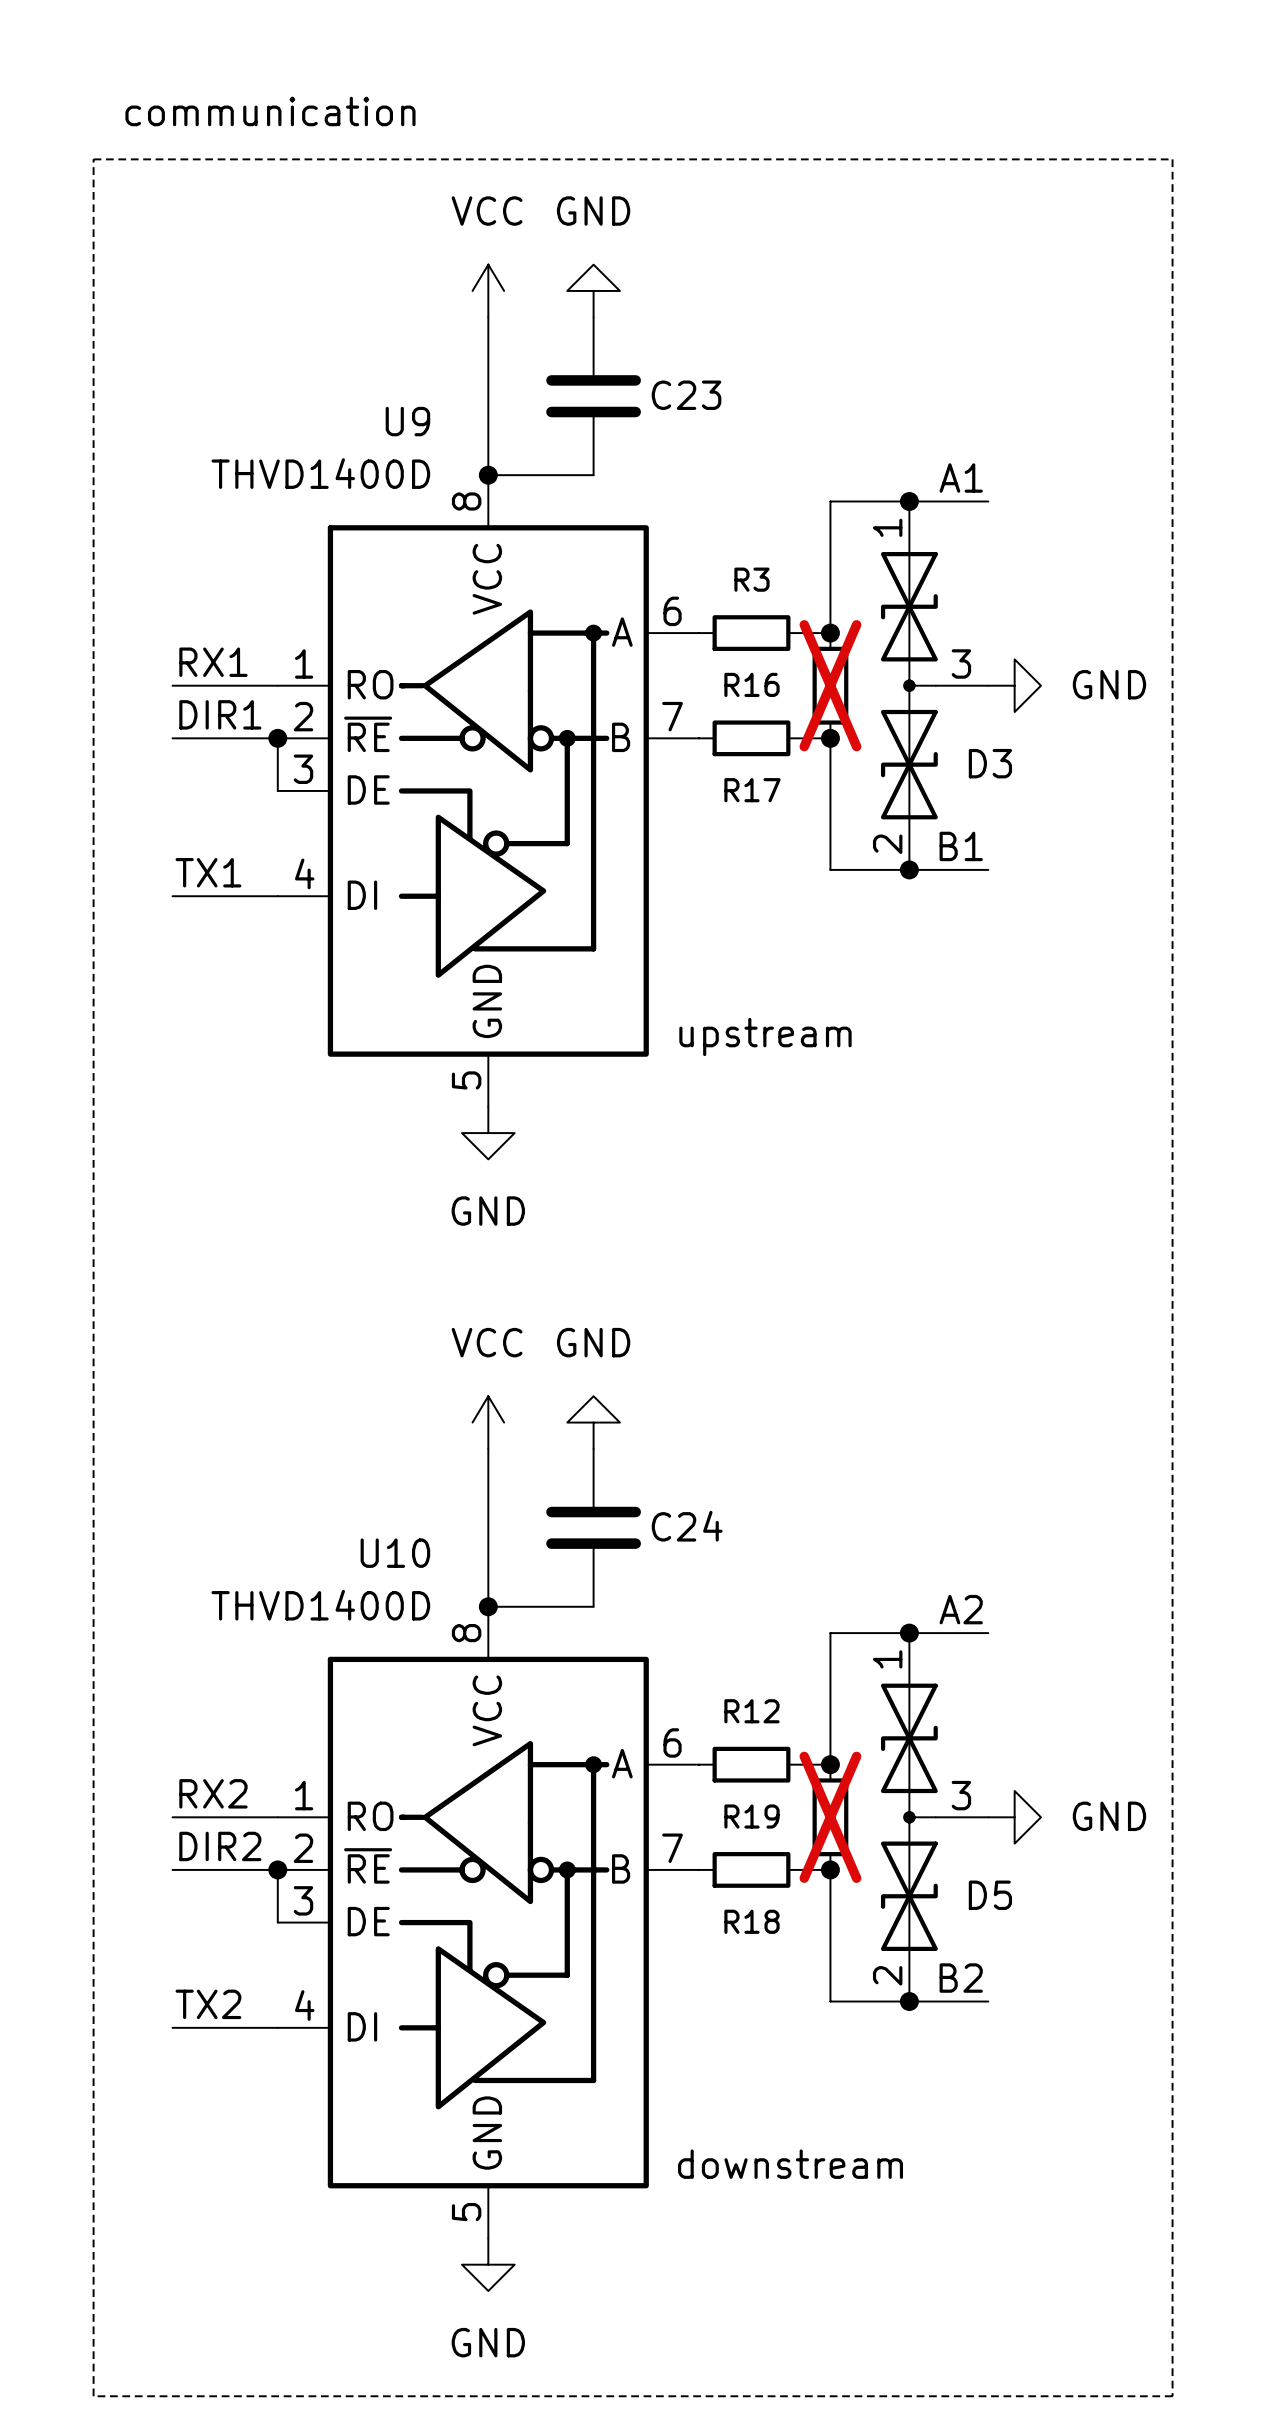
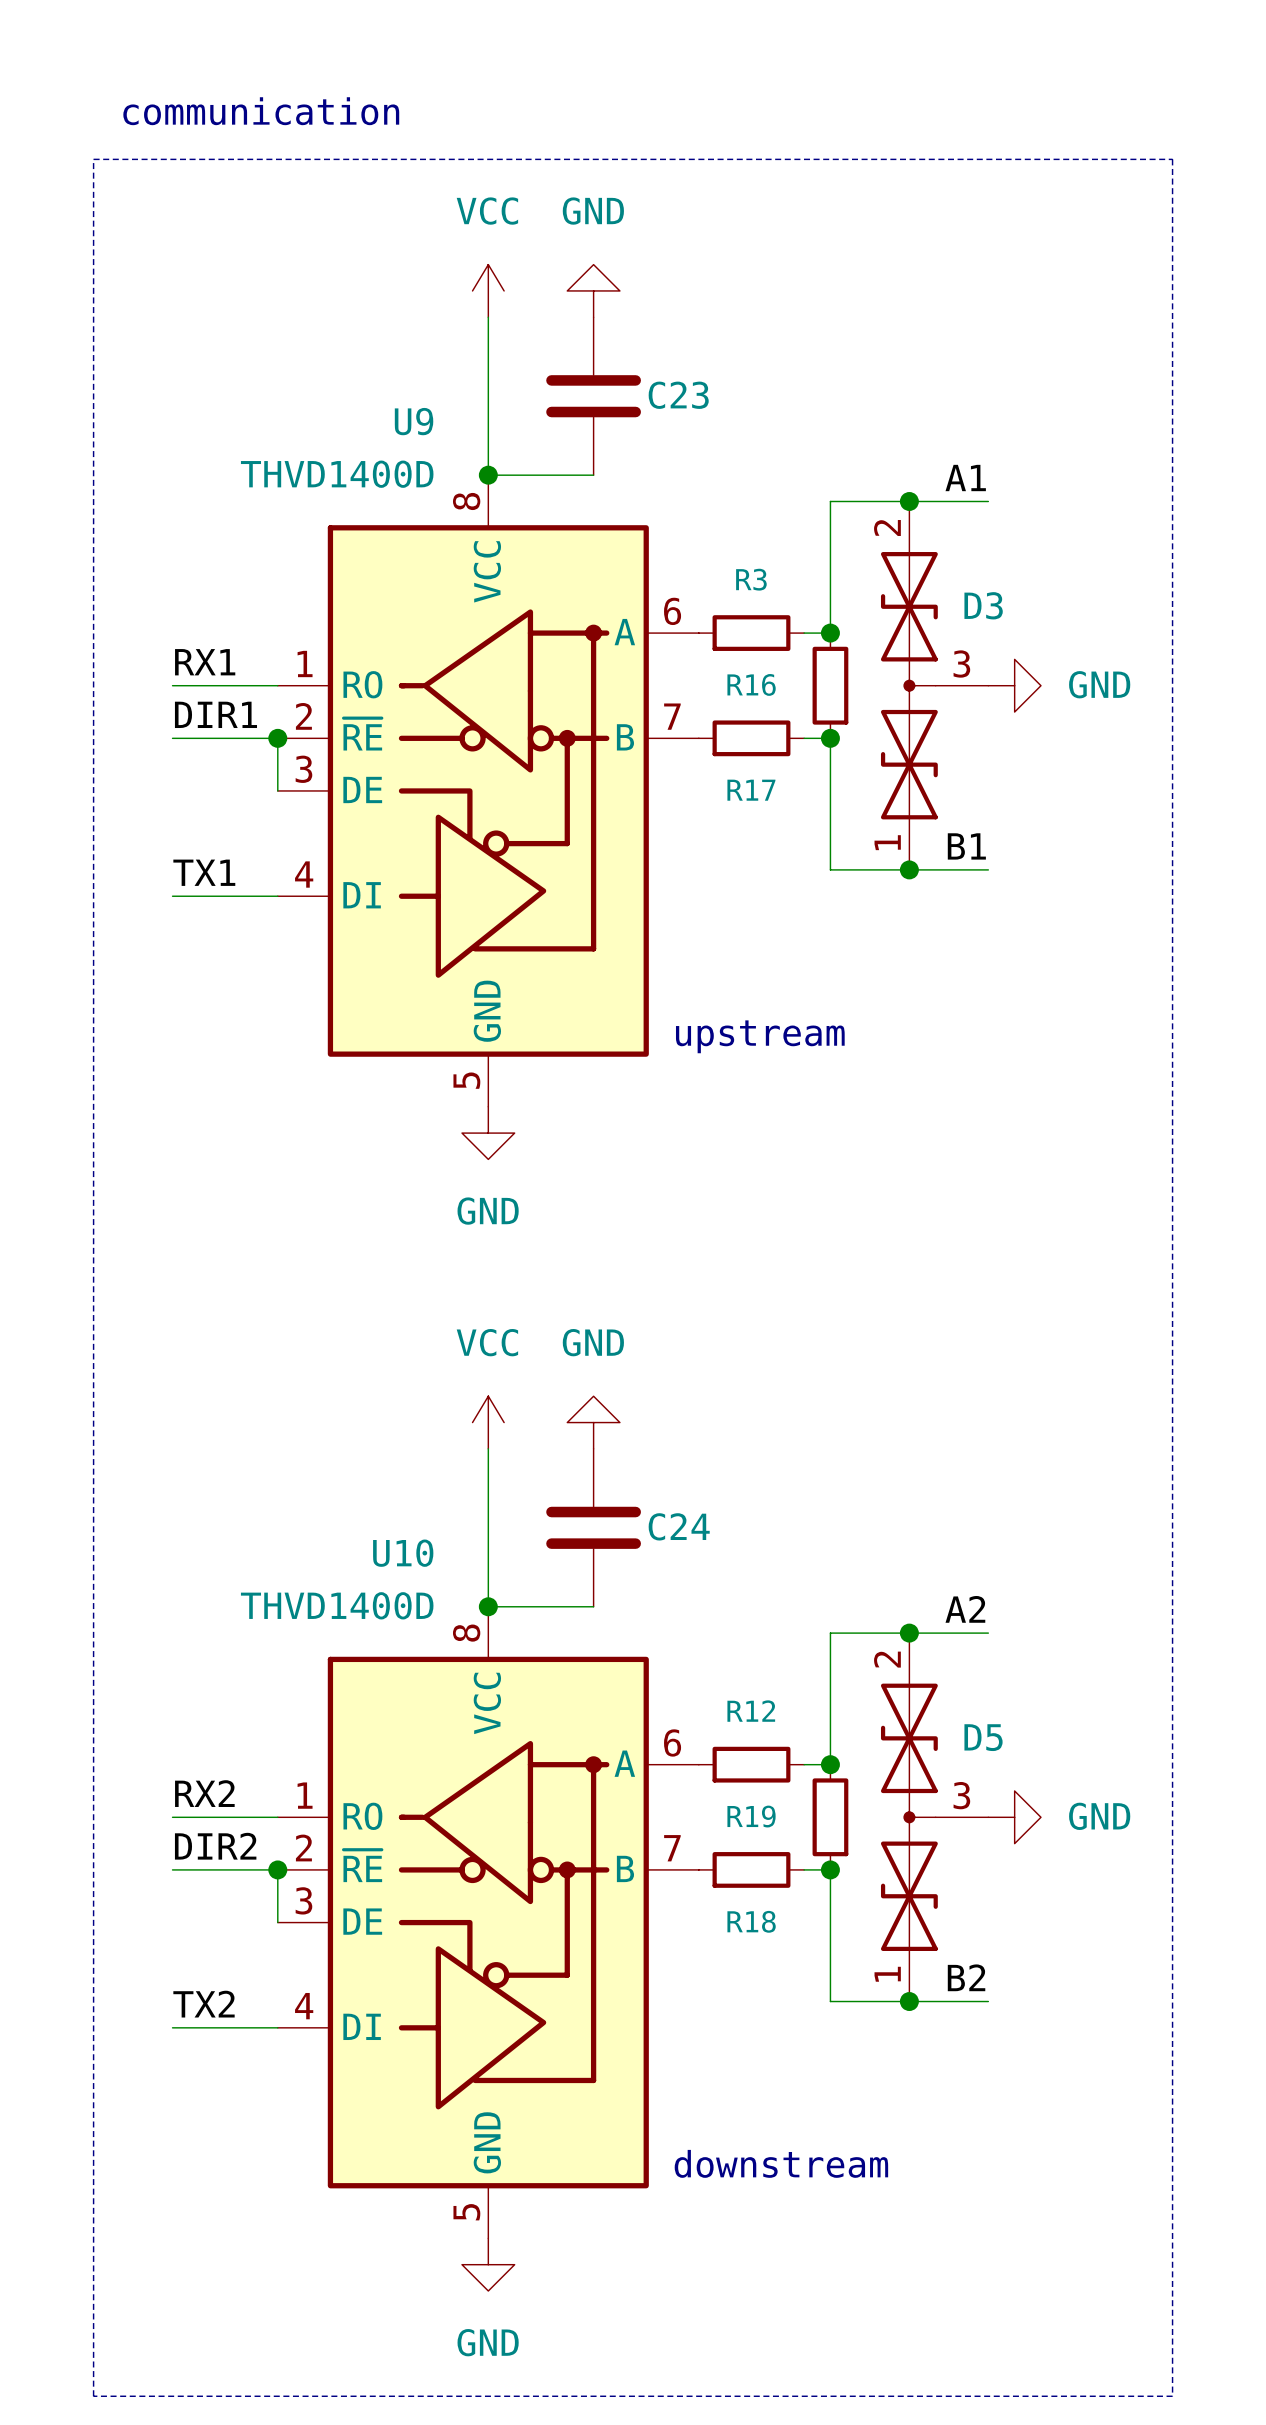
R16 do-not-place cross: (830, 685) -> none
D3 flip: as is (909, 685) -> up-down (909, 685)
R19 do-not-place cross: (830, 1817) -> none
D5 flip: as is (909, 1817) -> up-down (909, 1817)

